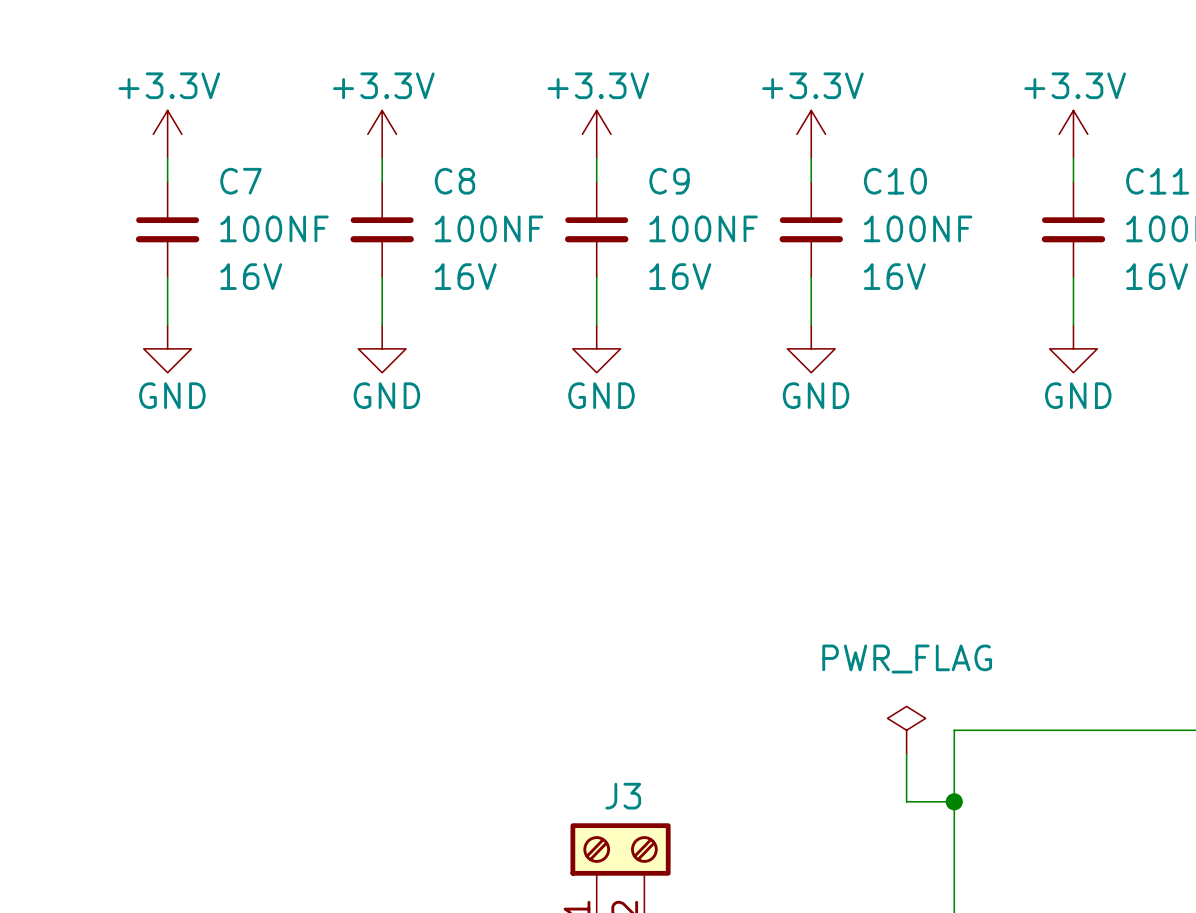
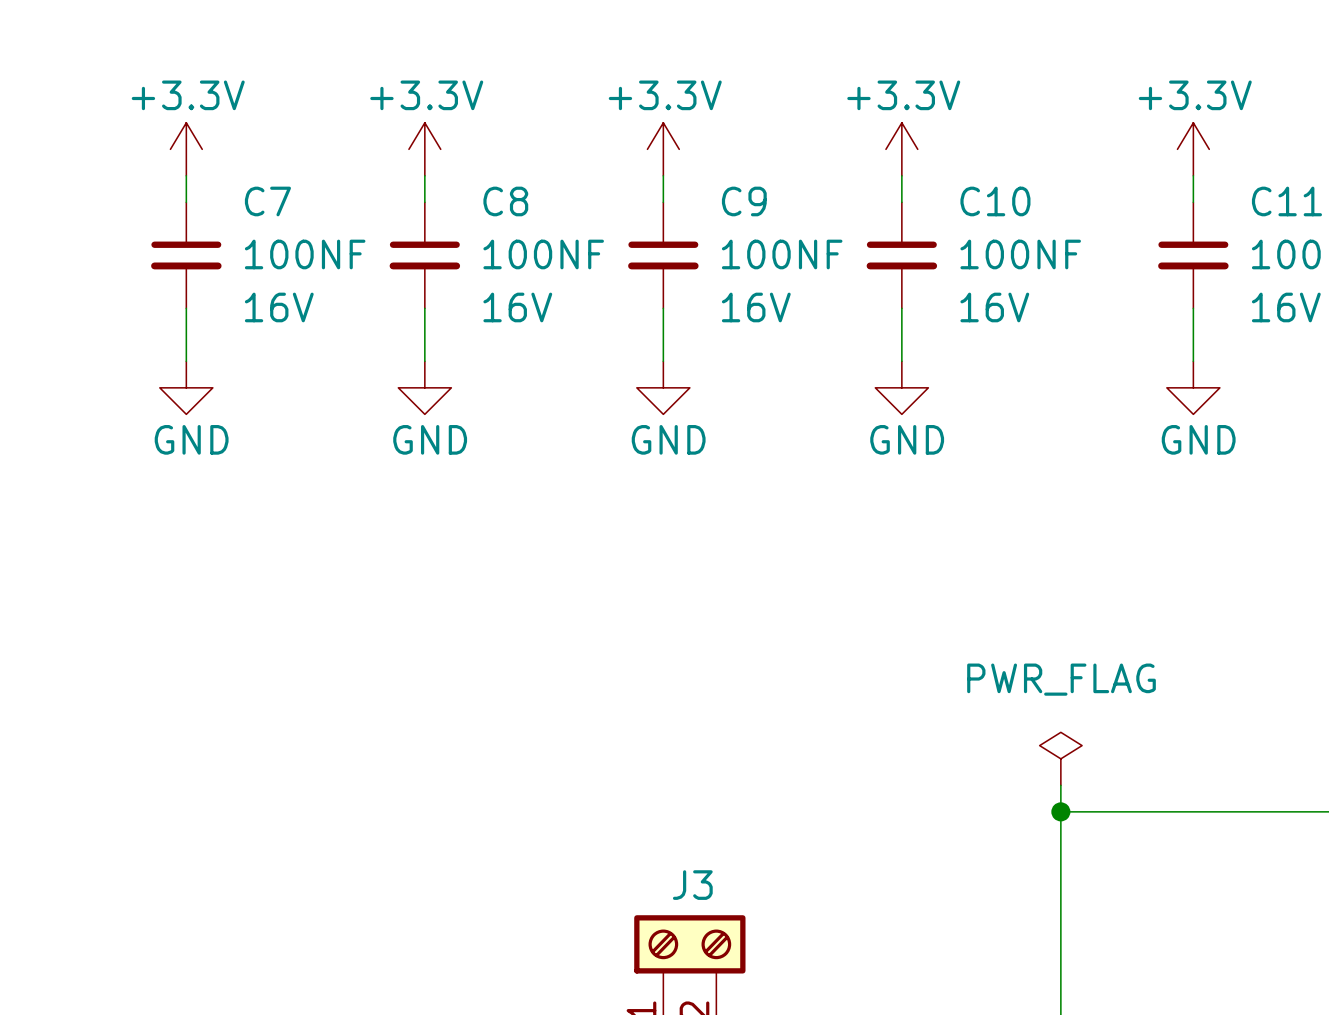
wire: none -> (1060, 785) (1060, 811)
power symbol position: PWR_FLAG (906, 730) -> PWR_FLAG (1060, 758)
wire: (906, 754) (906, 801) (954, 801) -> none
junction position: (954, 801) -> (1060, 811)

